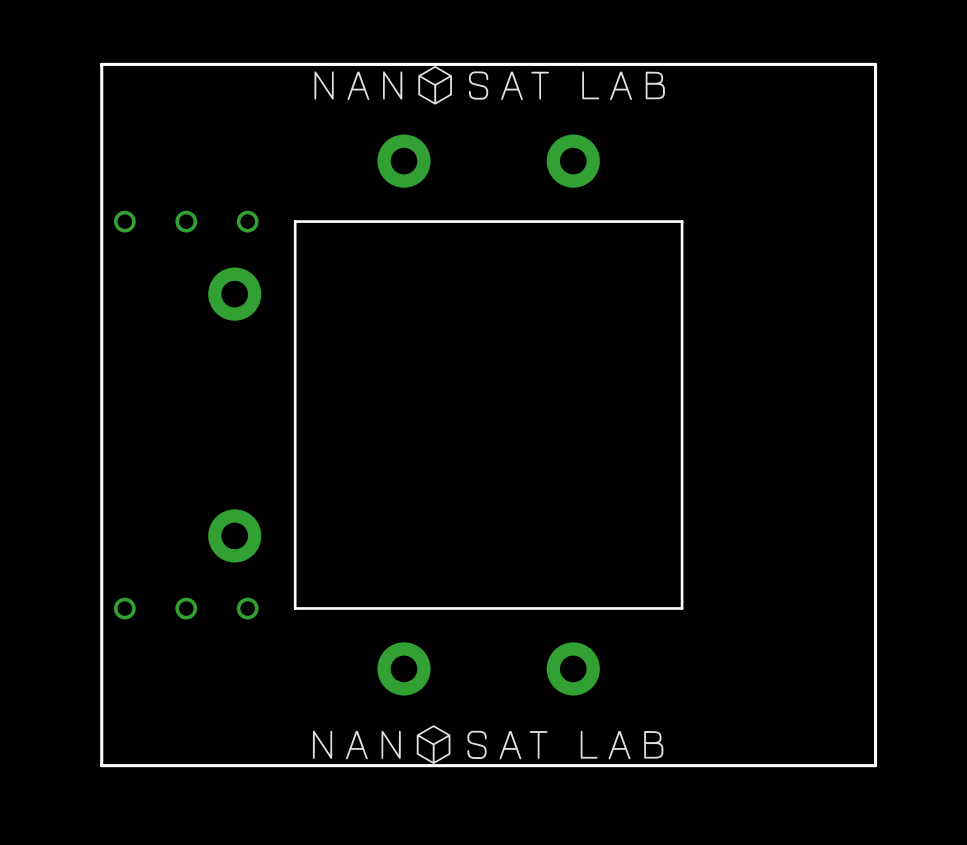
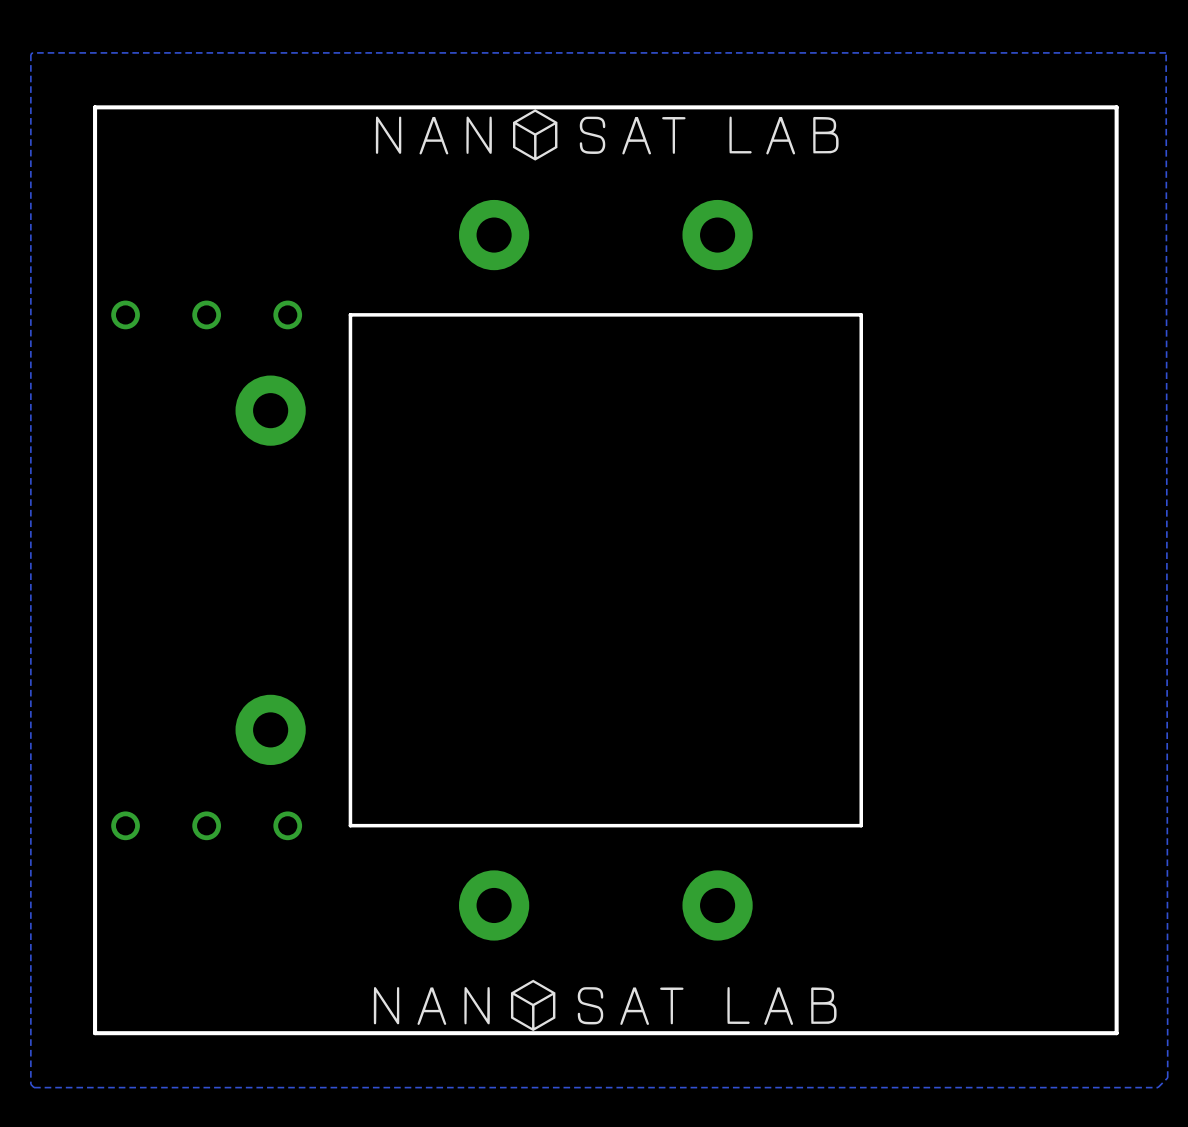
zone outline: none -> (1166, 52) (32, 52) (30, 54) (30, 1084) (34, 1087) (1157, 1087) (1167, 1077) (1166, 52)

